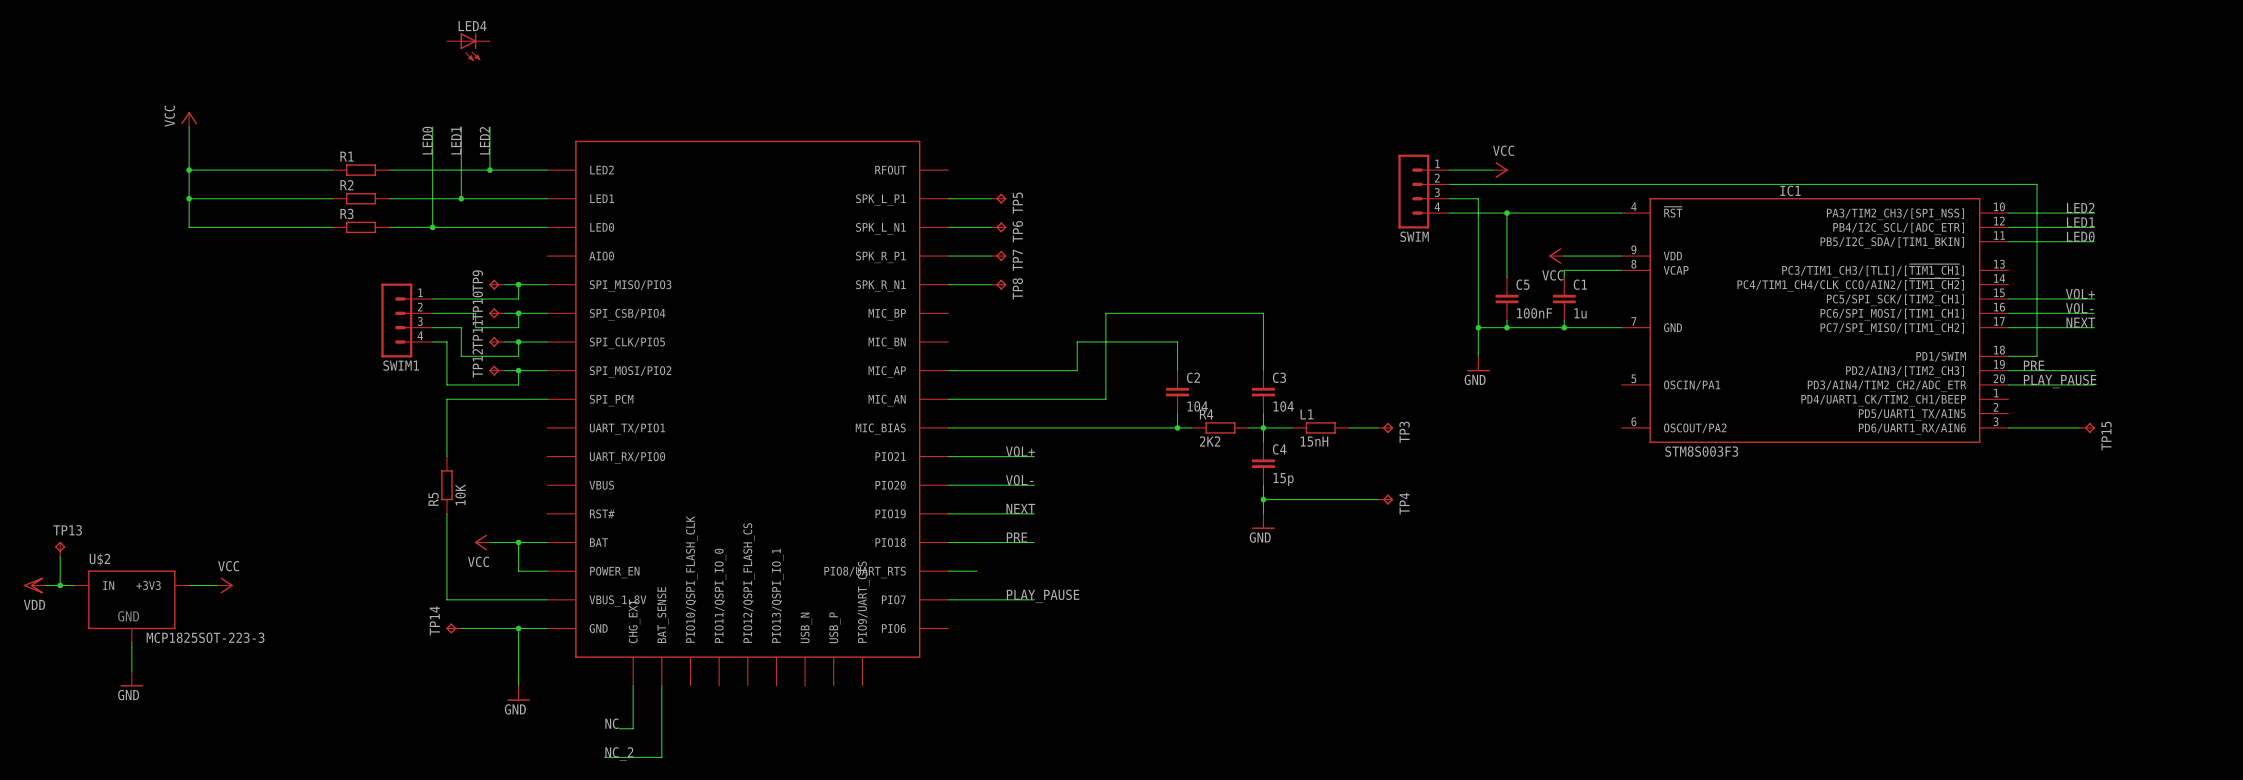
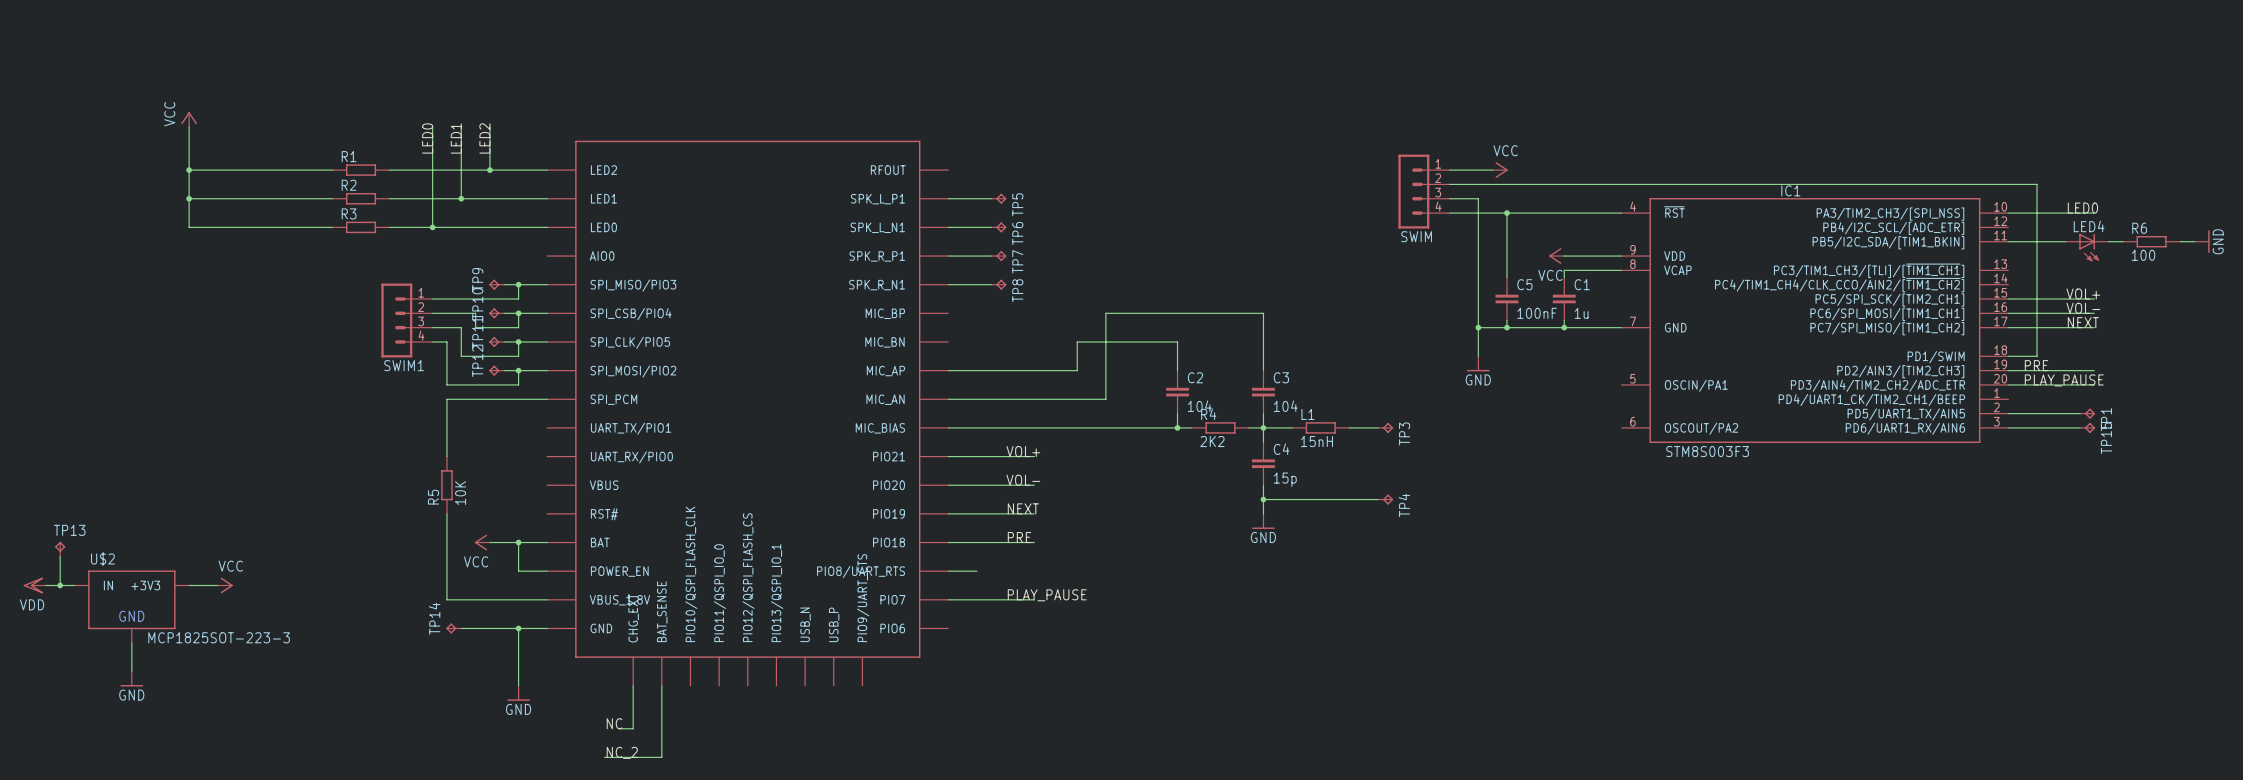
LED4 position: (468, 47) -> (2087, 247)
label: LED2 (2080, 207) -> LED0 (2082, 208)
label: LED1 (2080, 222) -> none
wire: (2008, 227) (2094, 227) -> none
label: LED0 (2080, 236) -> none
wire: none -> (2108, 241) (2122, 241)
R6: none -> 100 (2151, 241)
wire: none -> (2180, 241) (2194, 241)
power symbol: none -> GND (2202, 241)
wire: none -> (2008, 413) (2079, 413)
TP1: none -> (2087, 413)

